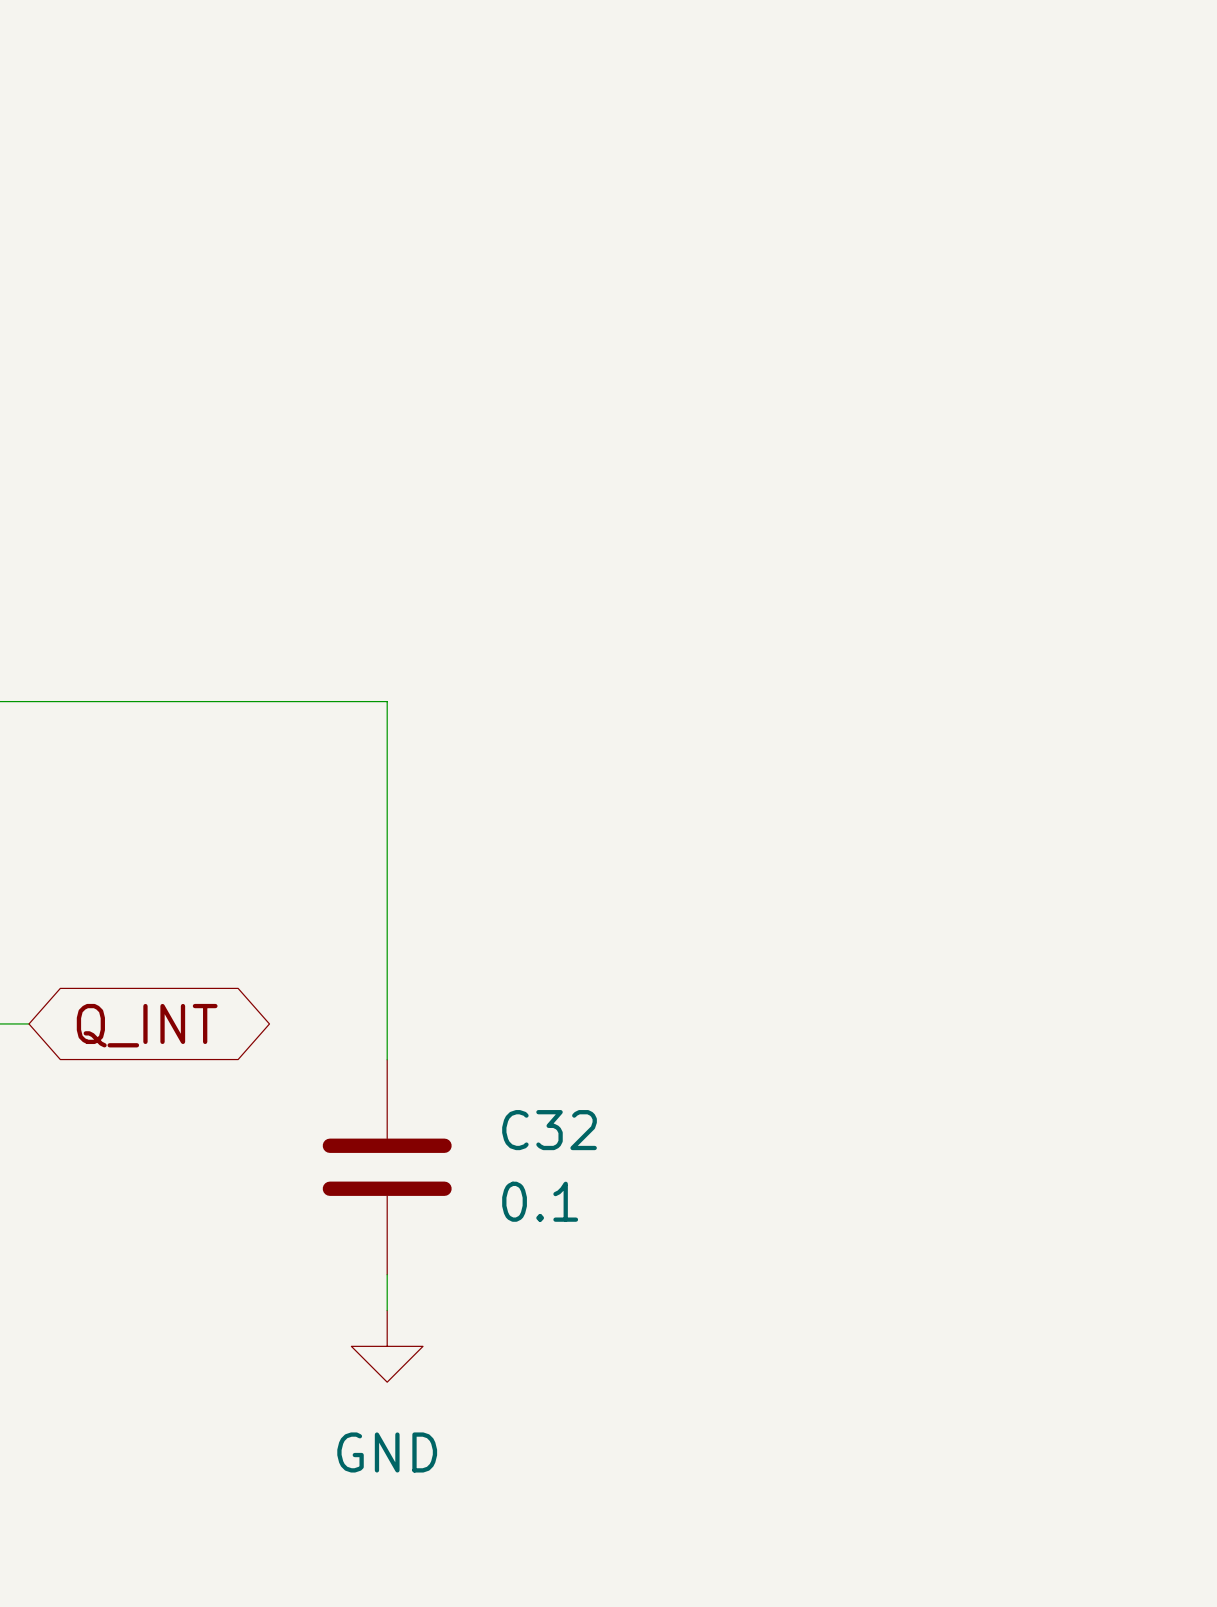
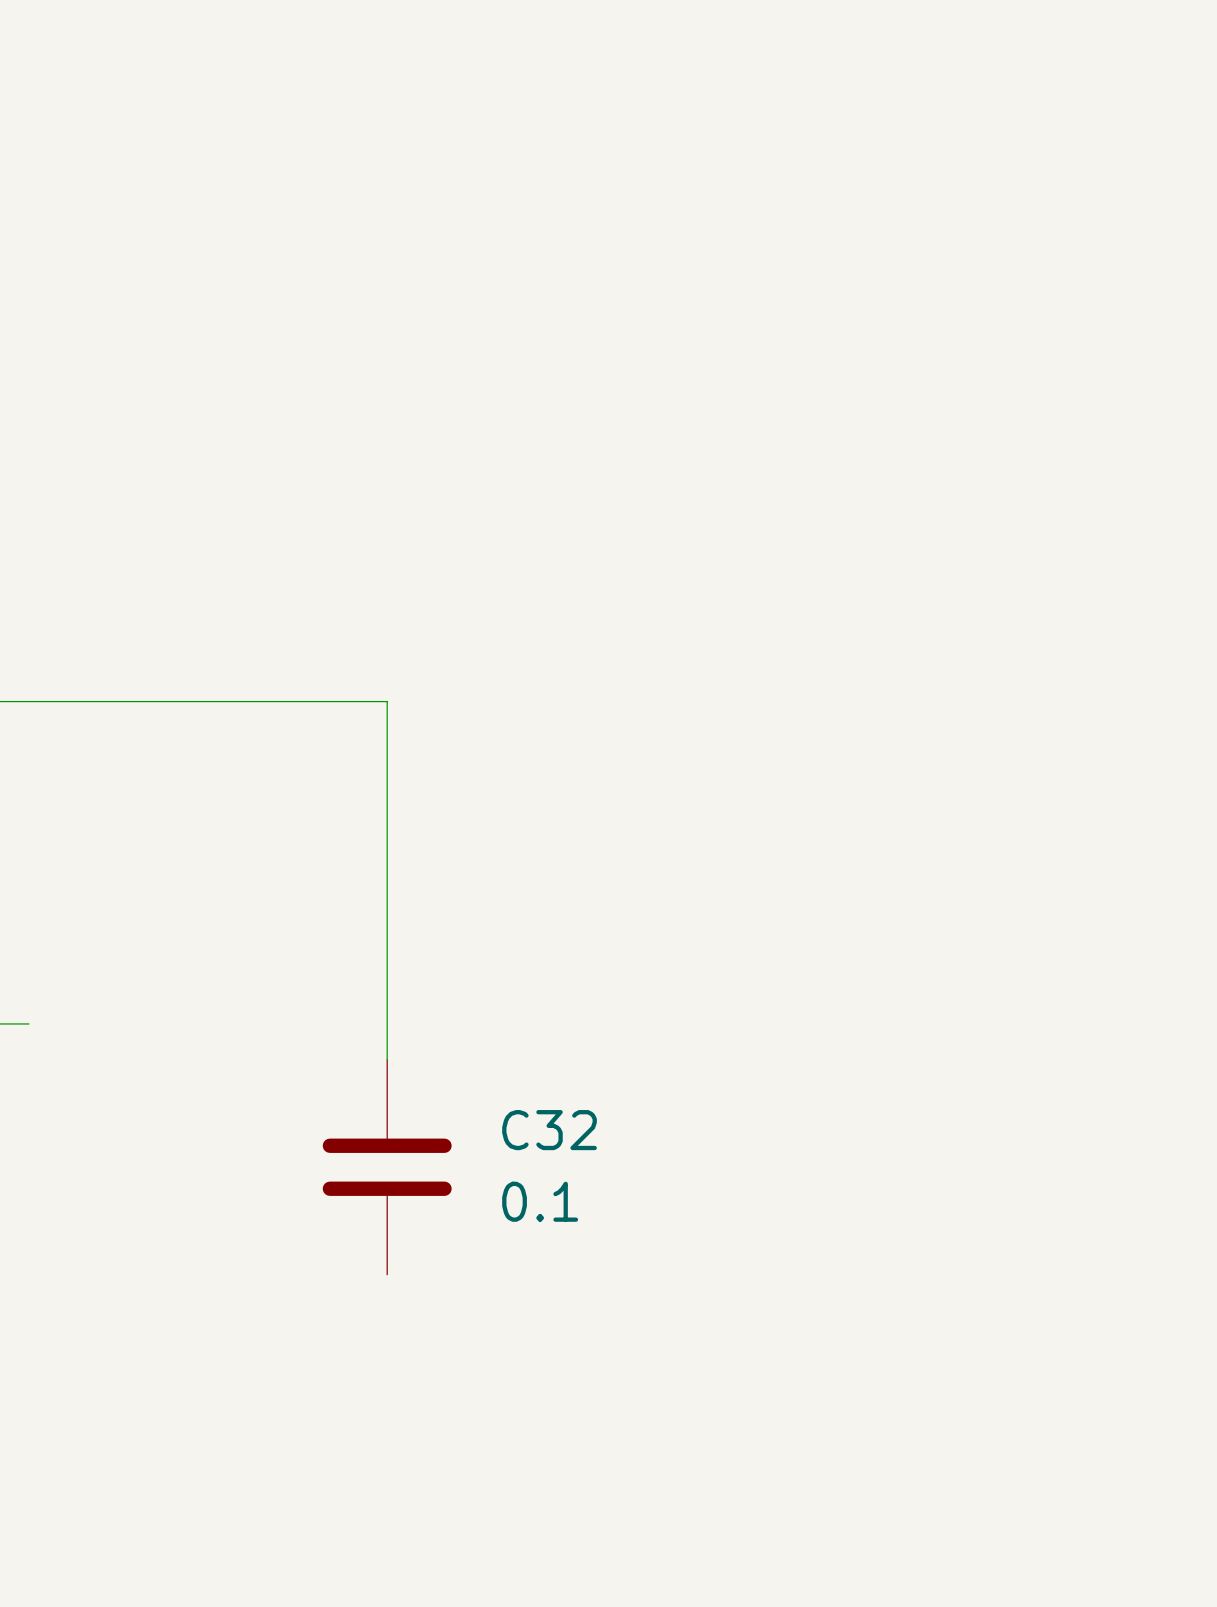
global label: Q_INT (147, 1025) -> none
wire: (387, 1274) (387, 1310) -> none
power symbol: GND (387, 1346) -> none

